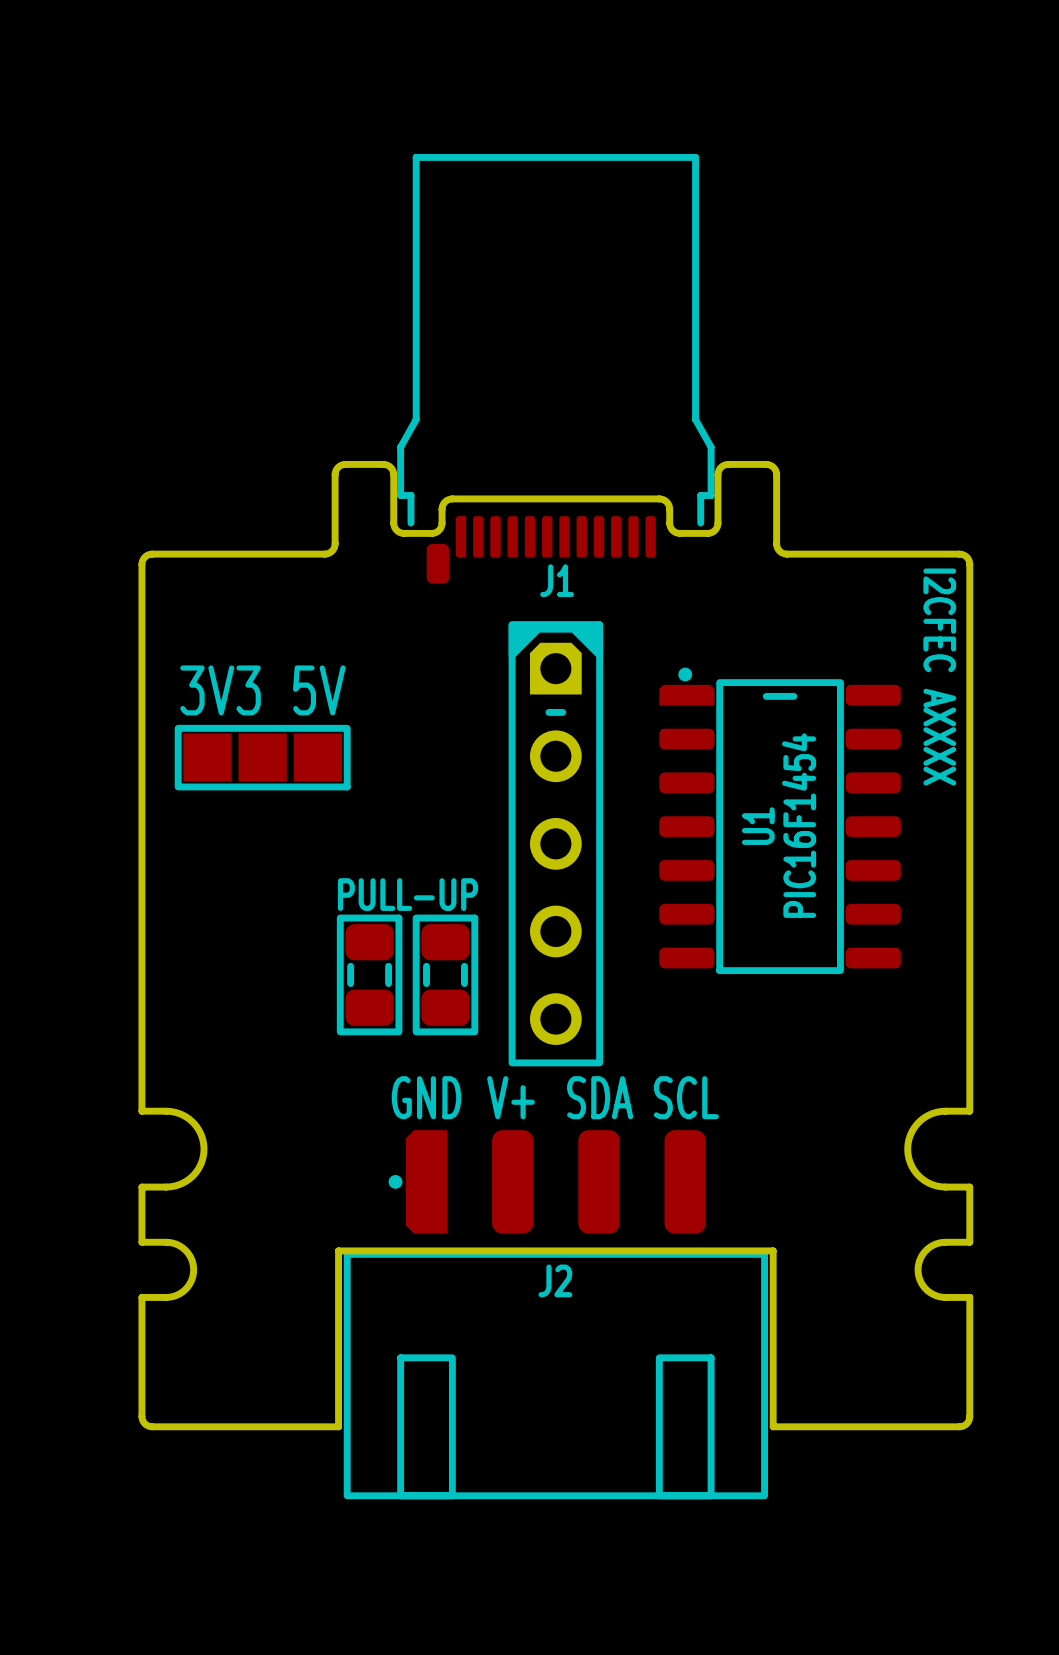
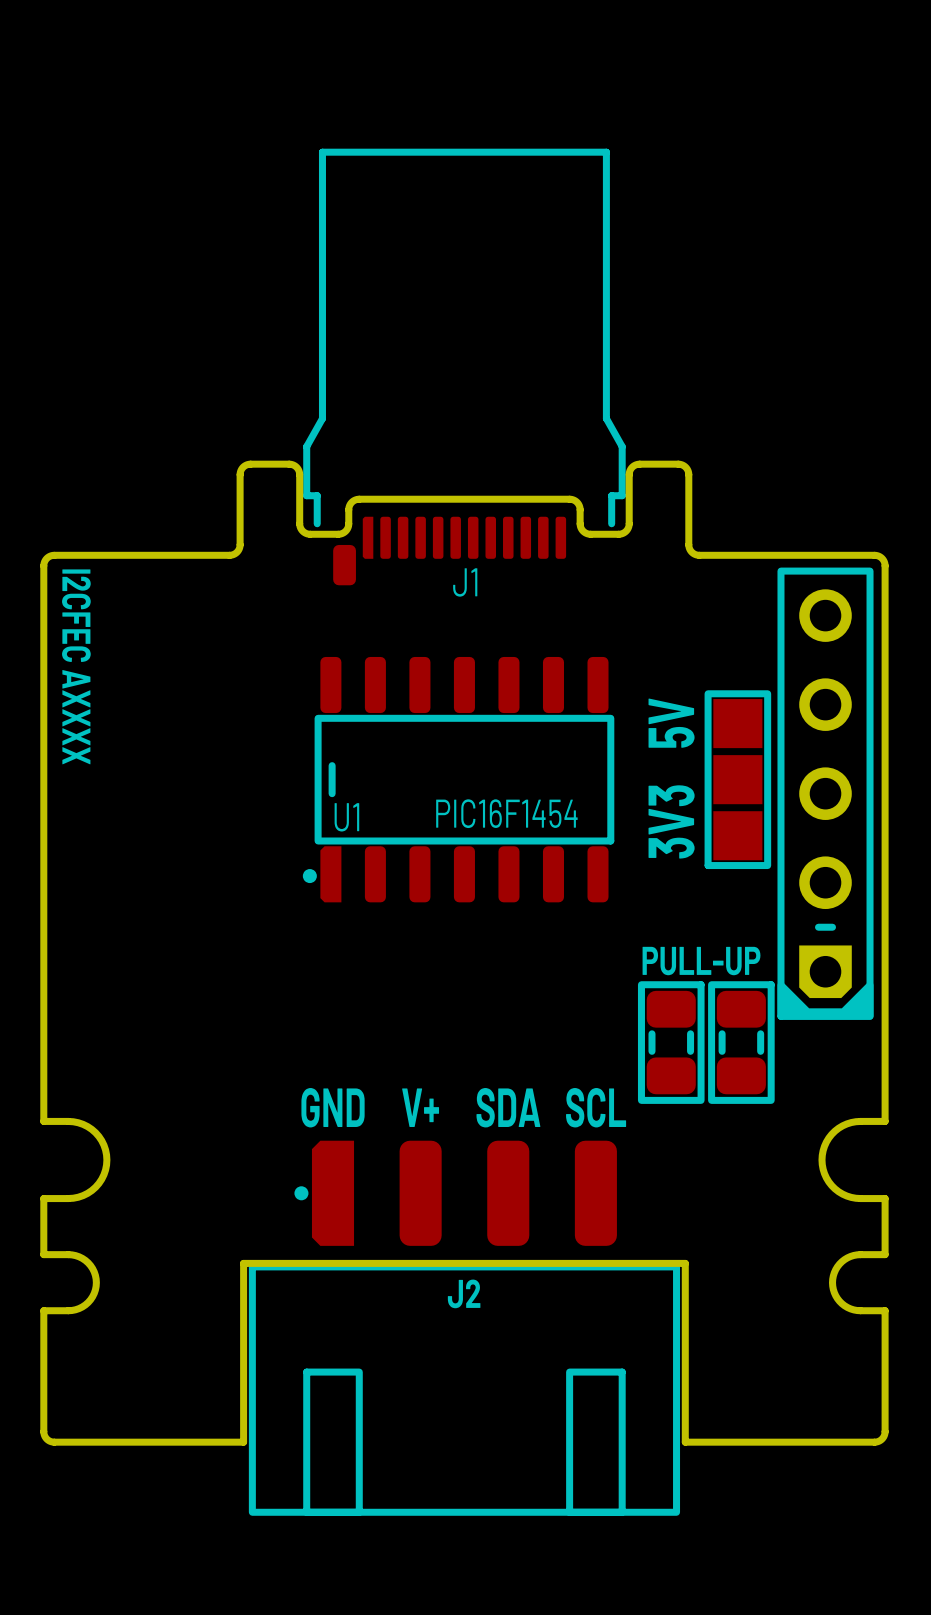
text position: I2CFEC AXXXX (939, 677) -> I2CFEC AXXXX (76, 666)
text rotation: 0° (220, 690) -> 90° counterclockwise (671, 821)
text position: 3V3 (220, 690) -> 3V3 (671, 821)
text rotation: 0° (319, 690) -> 90° counterclockwise (671, 723)
text position: 5V (319, 690) -> 5V (671, 723)
part rotation: 0° (262, 757) -> 90° clockwise (737, 779)
part position: (262, 757) -> (737, 779)
U1 rotation: 0° (780, 820) -> 90° counterclockwise (458, 779)
U1 position: (780, 820) -> (458, 779)
U1 name position: U1 (758, 826) -> U1 (346, 817)
part rotation: 0° (555, 843) -> 180° (825, 793)
part position: (555, 843) -> (825, 793)
text position: PULL-UP (408, 894) -> PULL-UP (701, 961)
part: (369, 974) -> none
part: (445, 974) -> none
part: none -> (671, 1042)
part: none -> (741, 1042)

